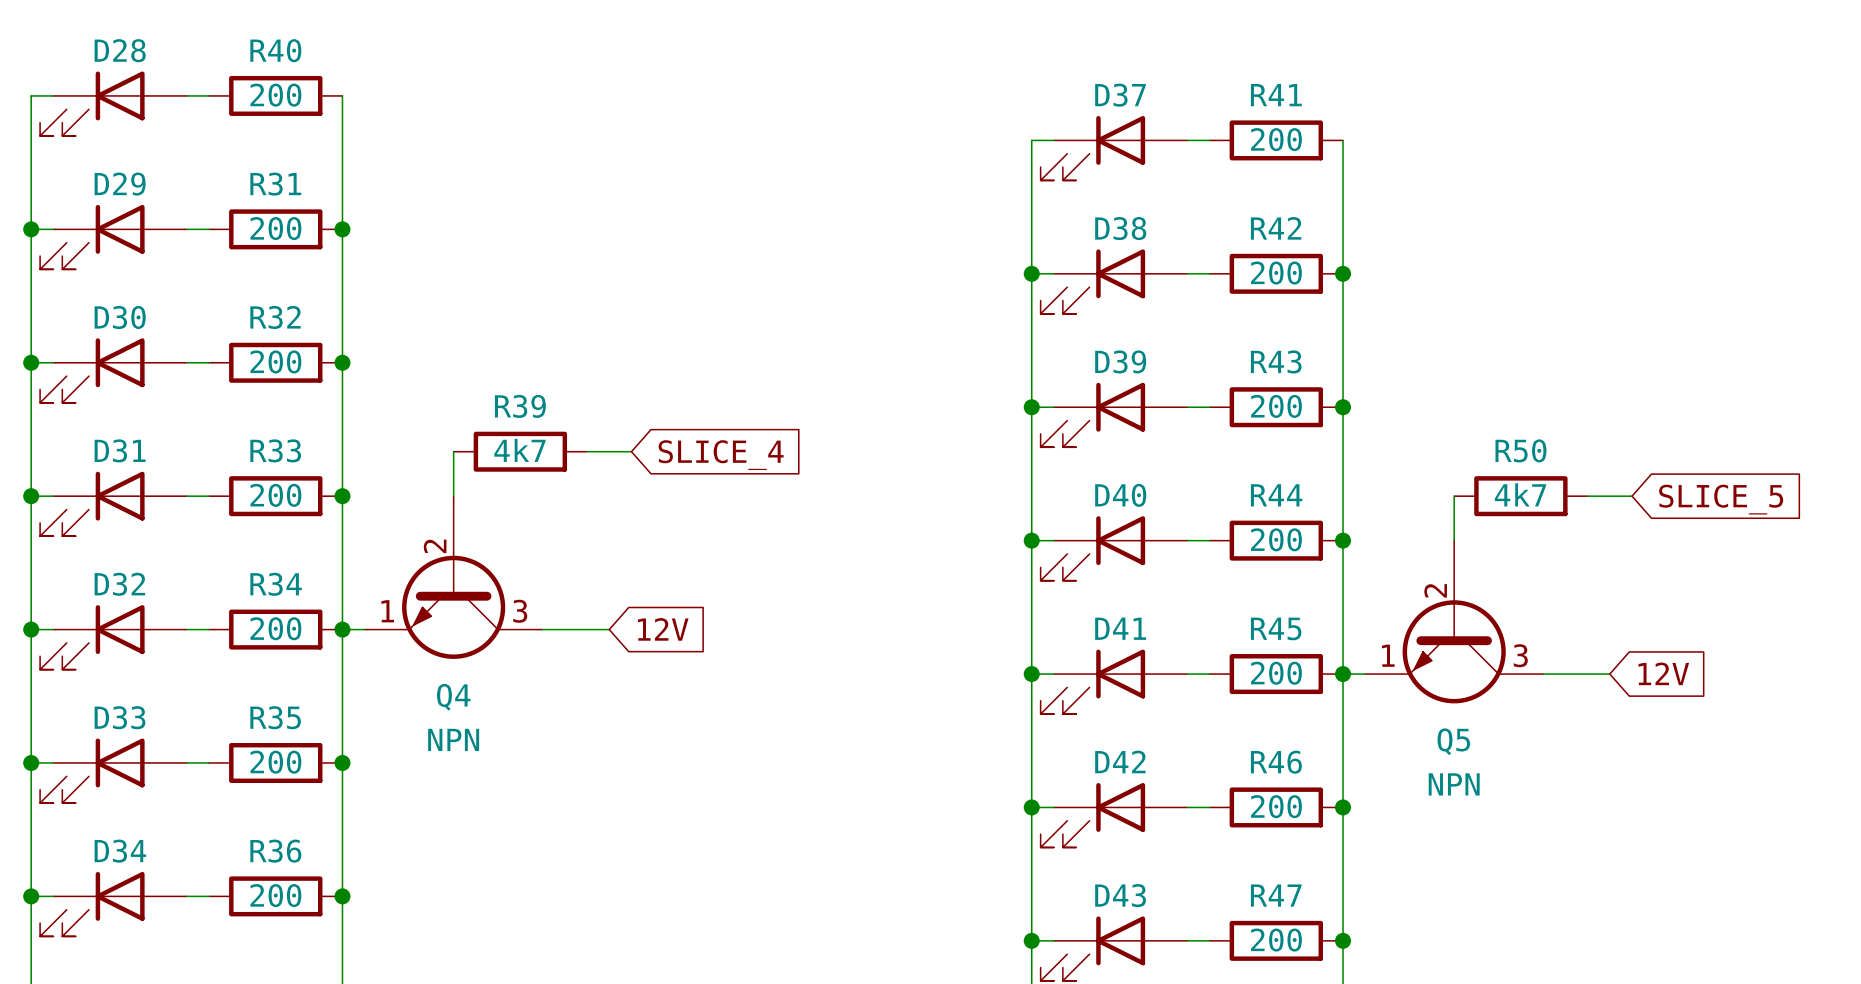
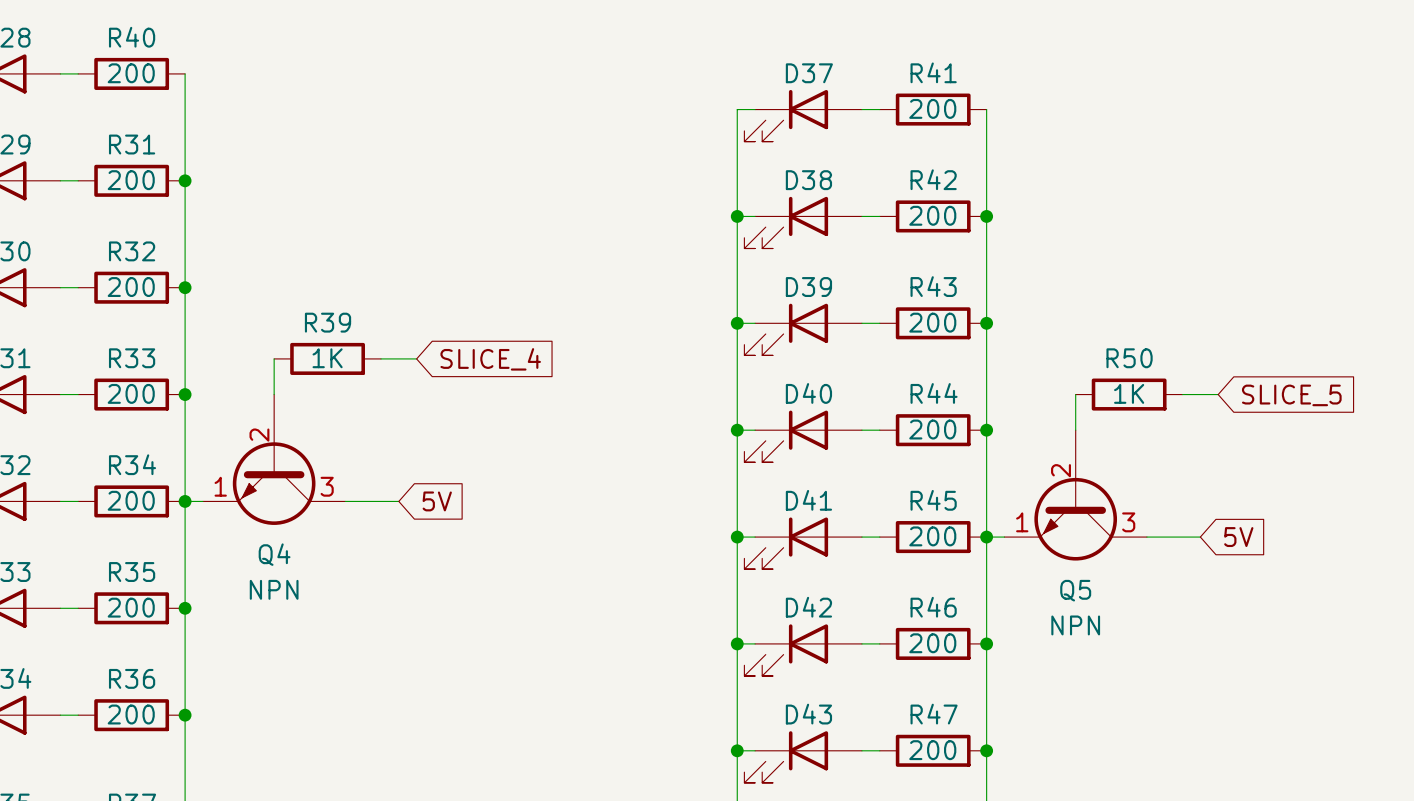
R39 value: 4k7 (519, 450) -> 1K (327, 358)
R50 value: 4k7 (1520, 494) -> 1K (1129, 393)
global label: 12V (663, 629) -> 5V (437, 501)
global label: 12V (1663, 673) -> 5V (1238, 537)

